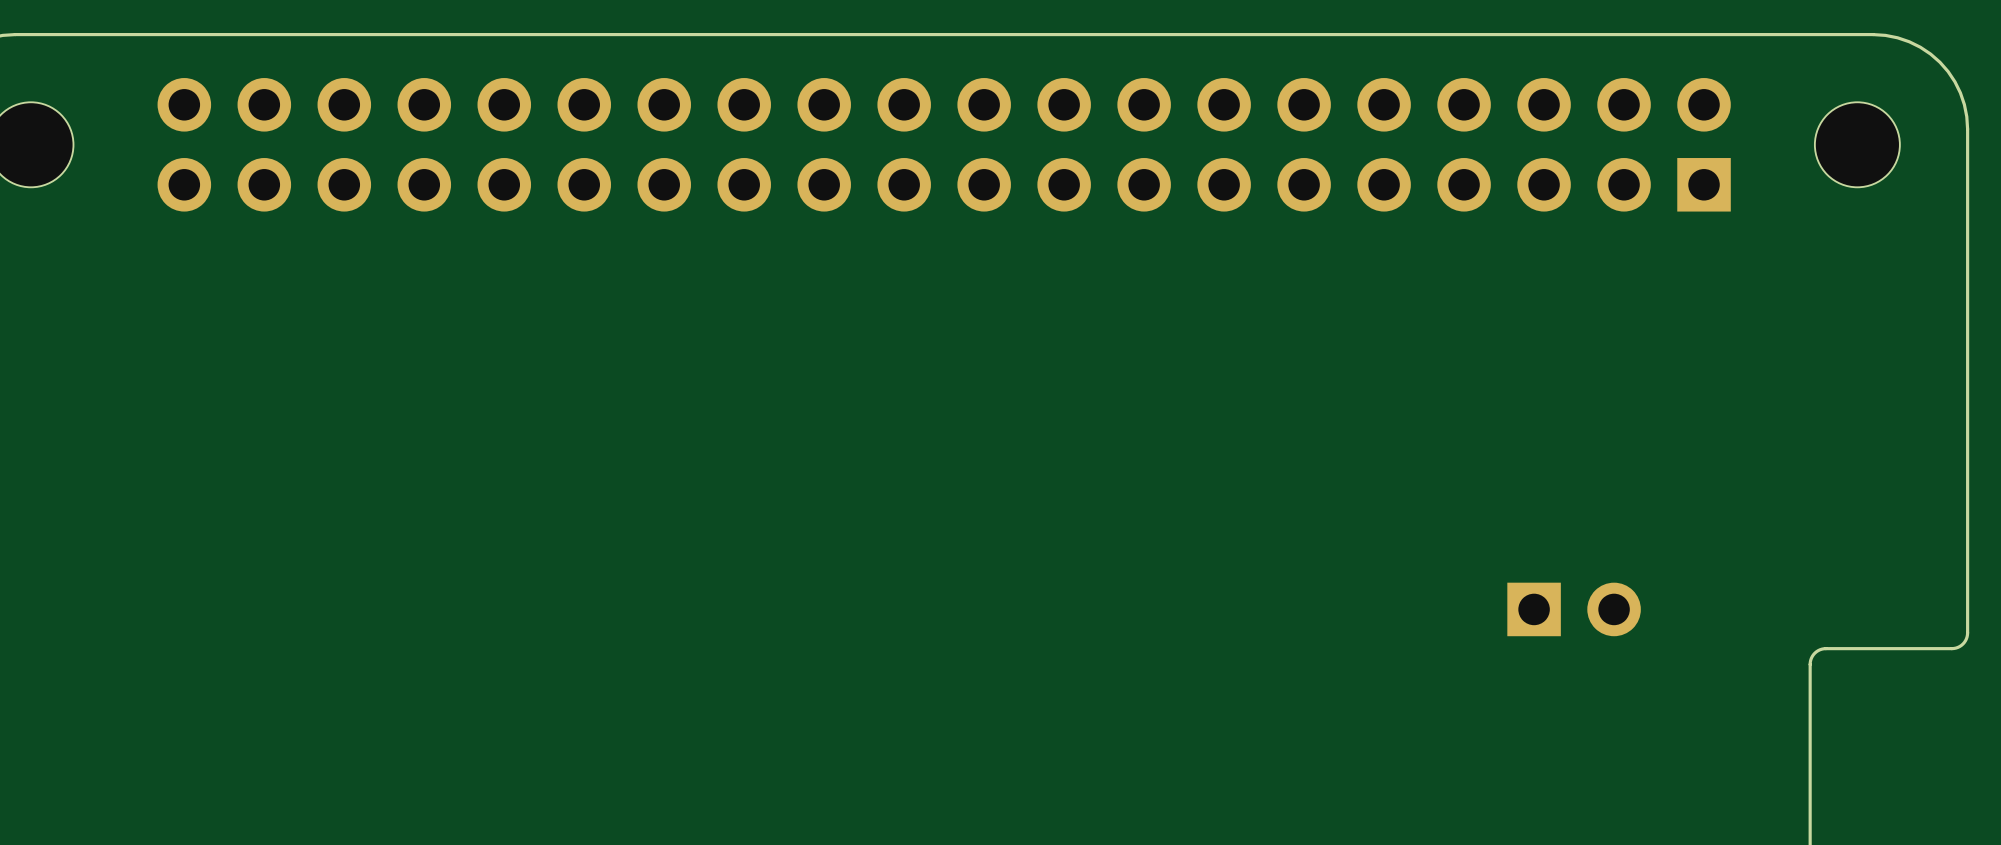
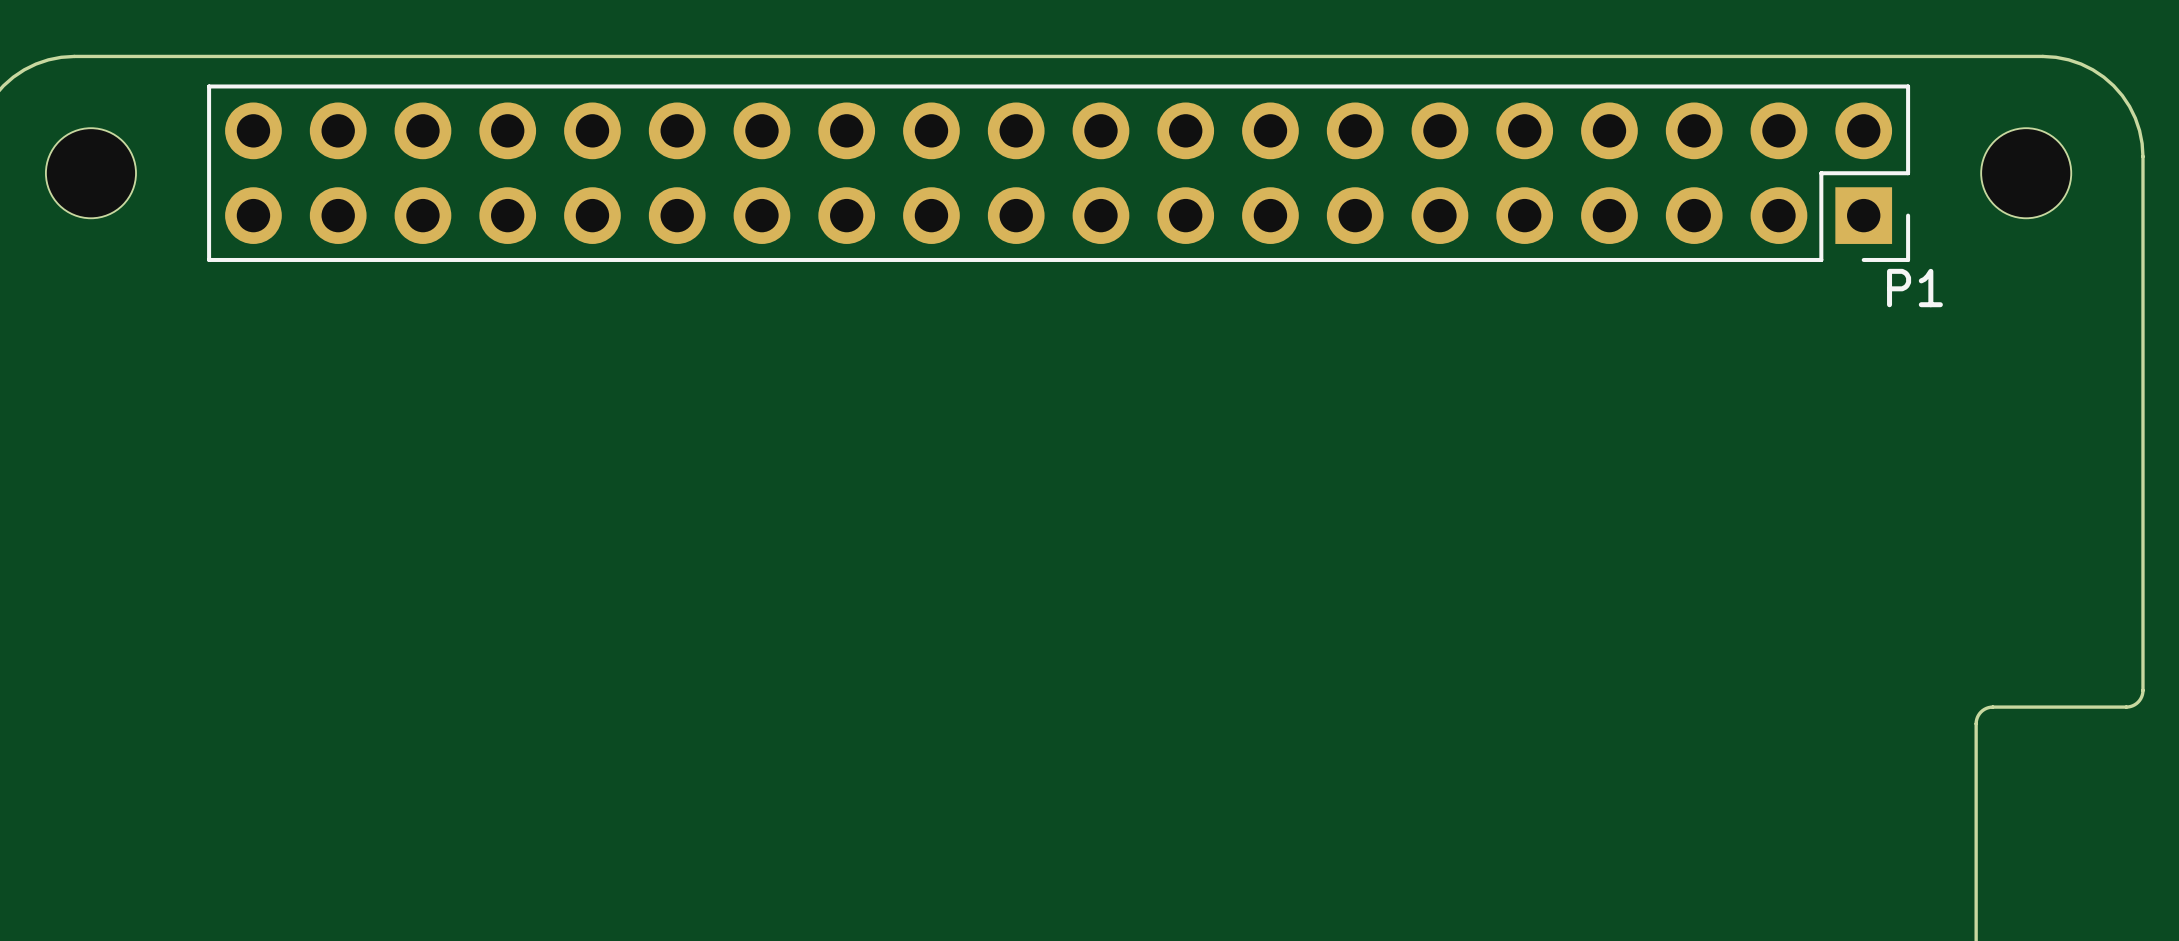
P1: none -> (1058, 173)
part: (1574, 609) -> none

